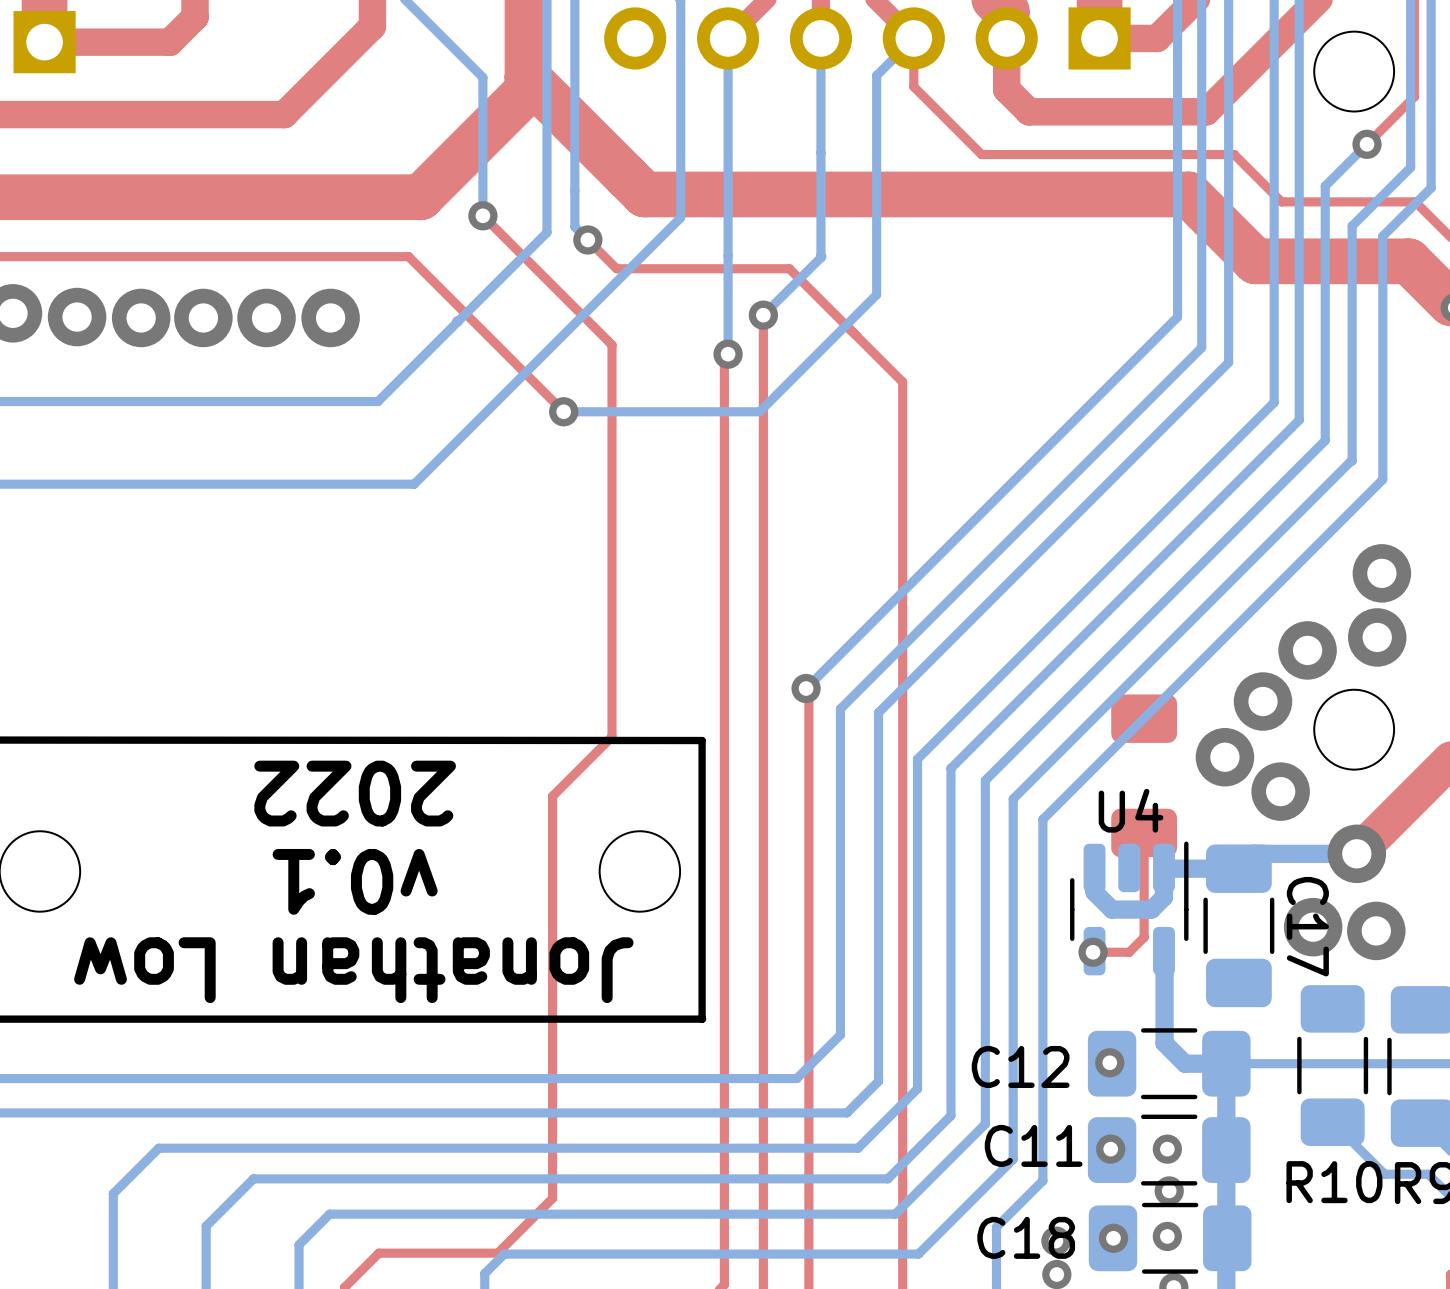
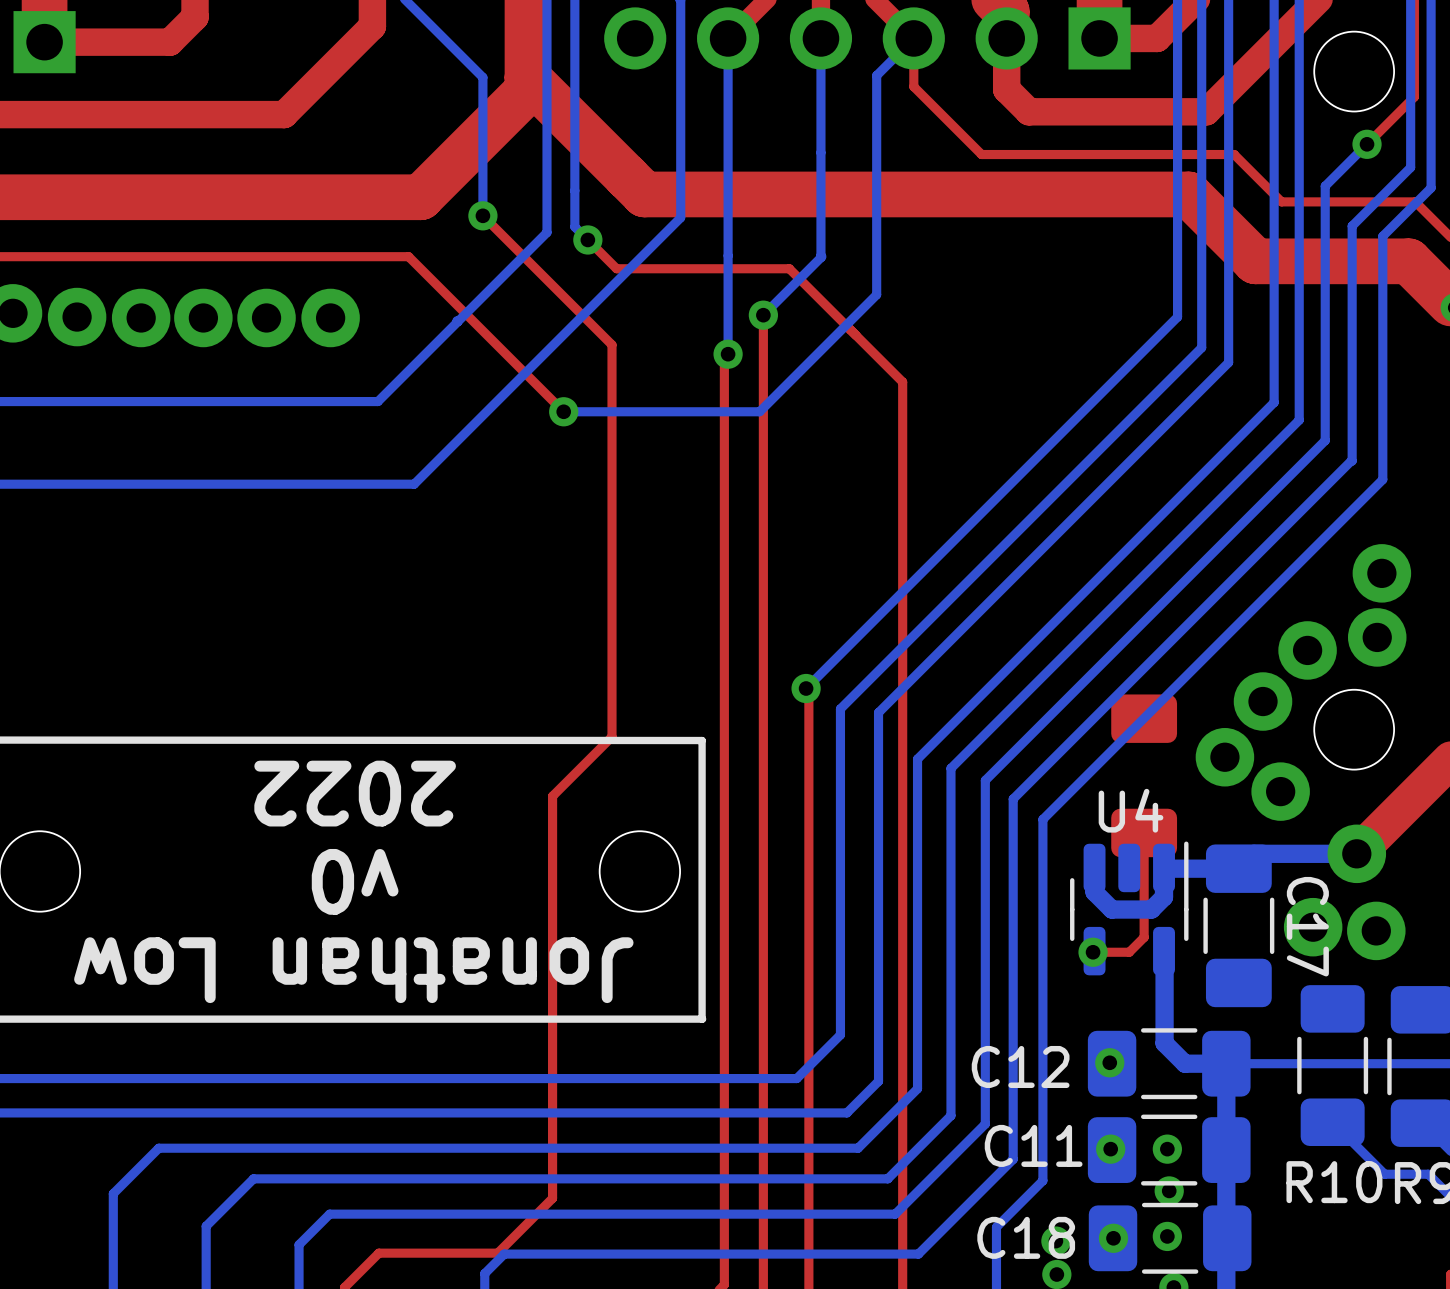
text: v0.1 (355, 881) -> v0 (355, 881)

